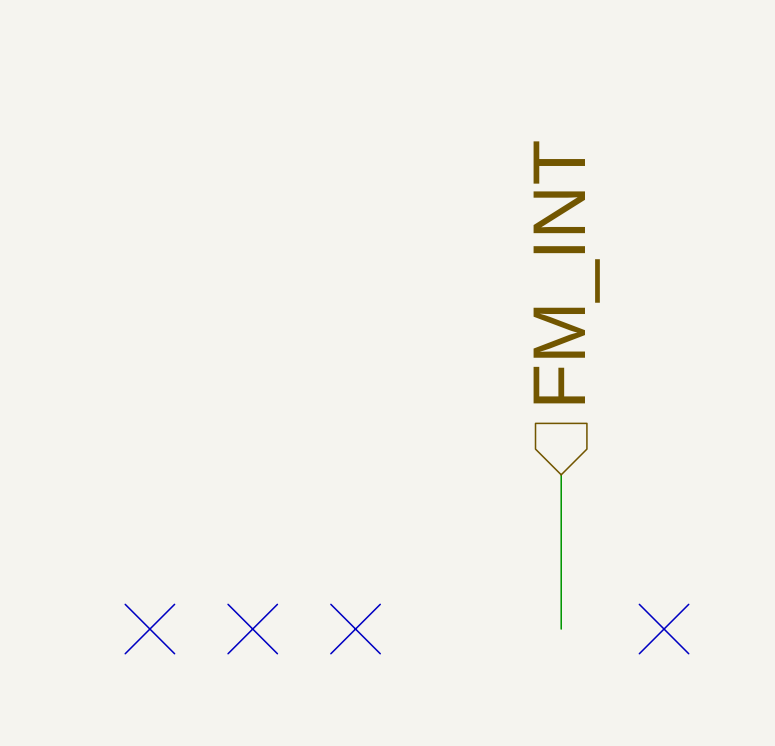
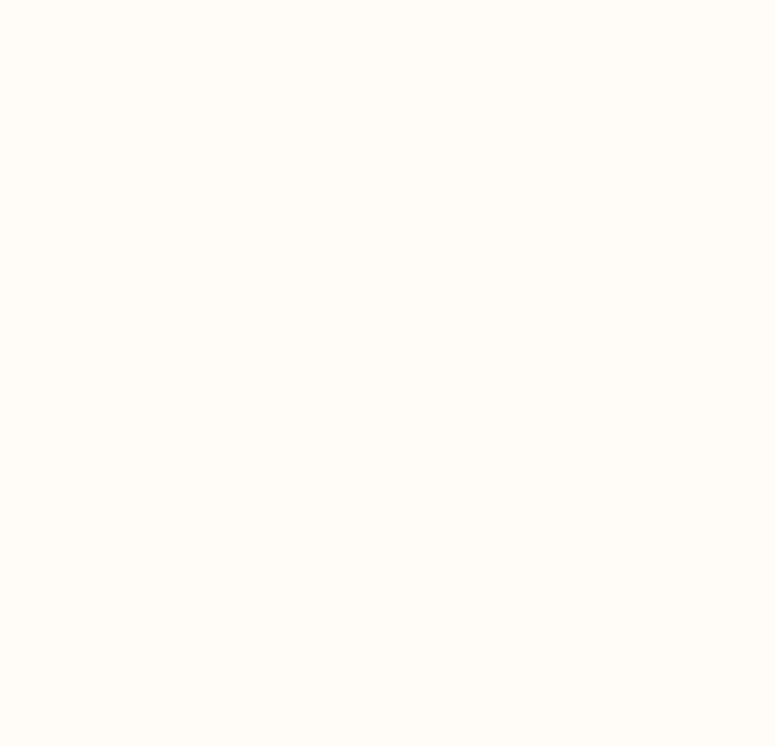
hierarchical label: FM_INT (566, 272) -> none
wire: (561, 474) (561, 629) -> none
no-connect mark: (149, 629) -> none
no-connect mark: (252, 629) -> none
no-connect mark: (355, 629) -> none
no-connect mark: (664, 629) -> none

